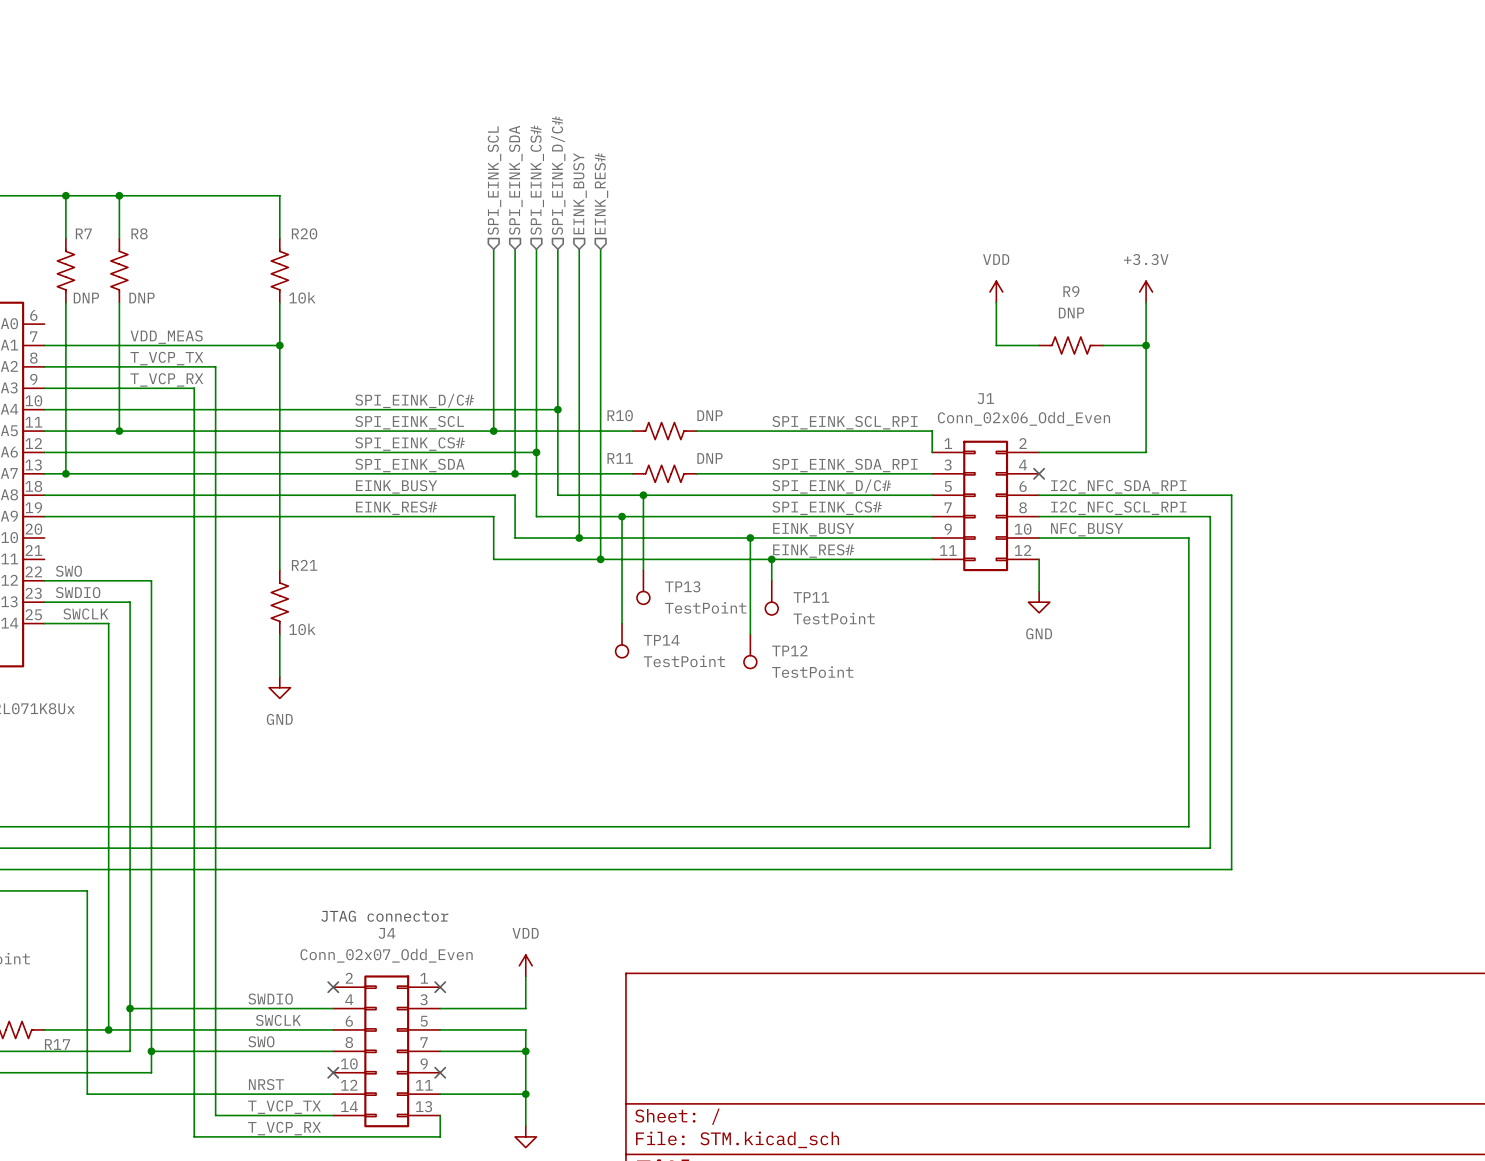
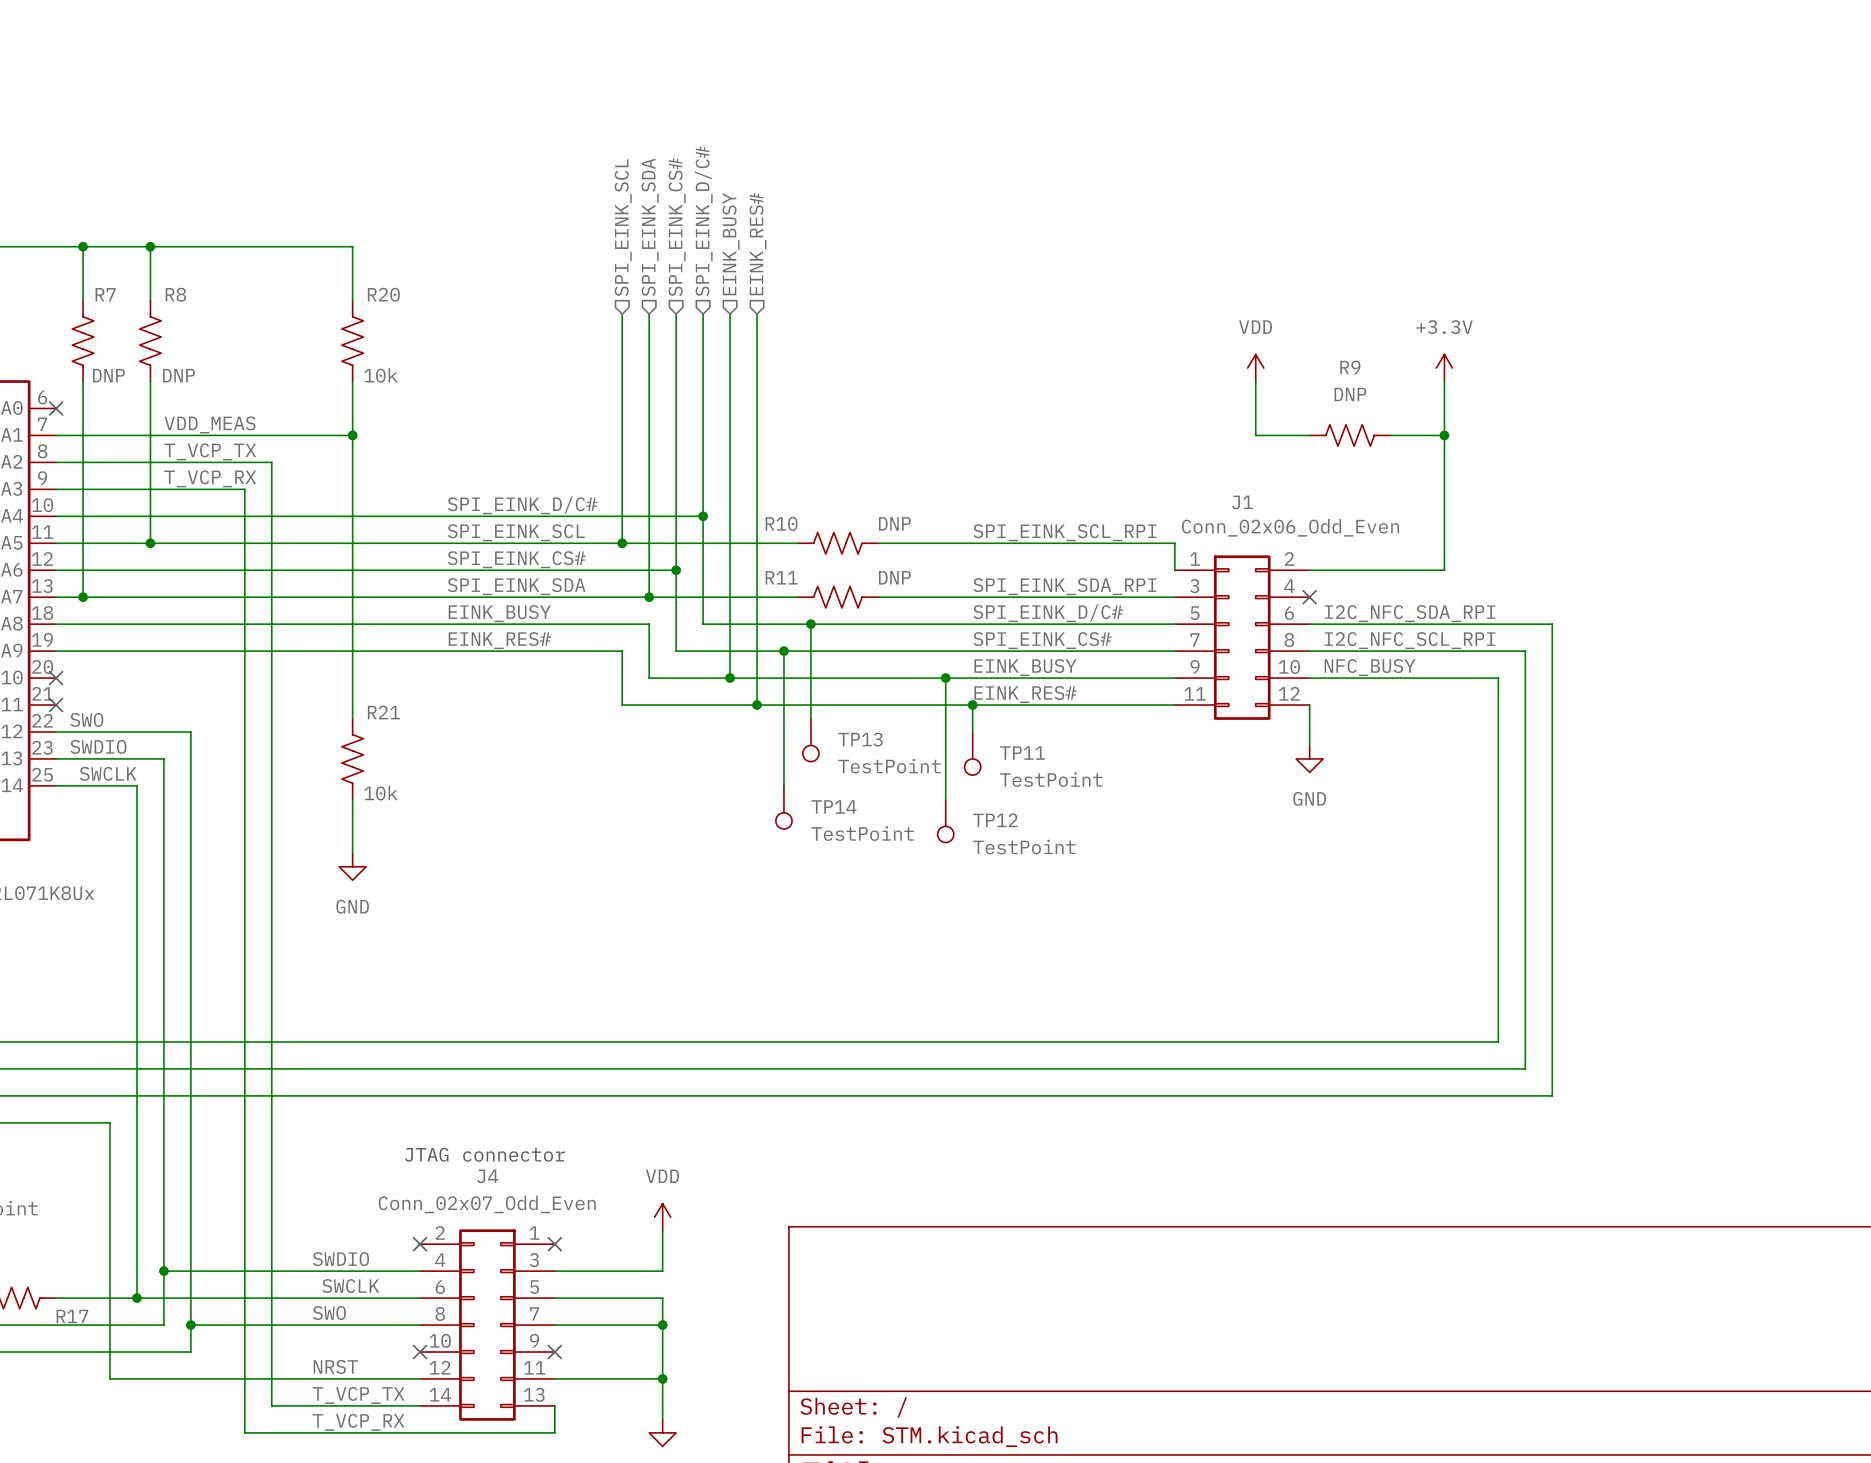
no-connect mark: none -> (56, 408)
no-connect mark: none -> (56, 678)
no-connect mark: none -> (56, 705)

